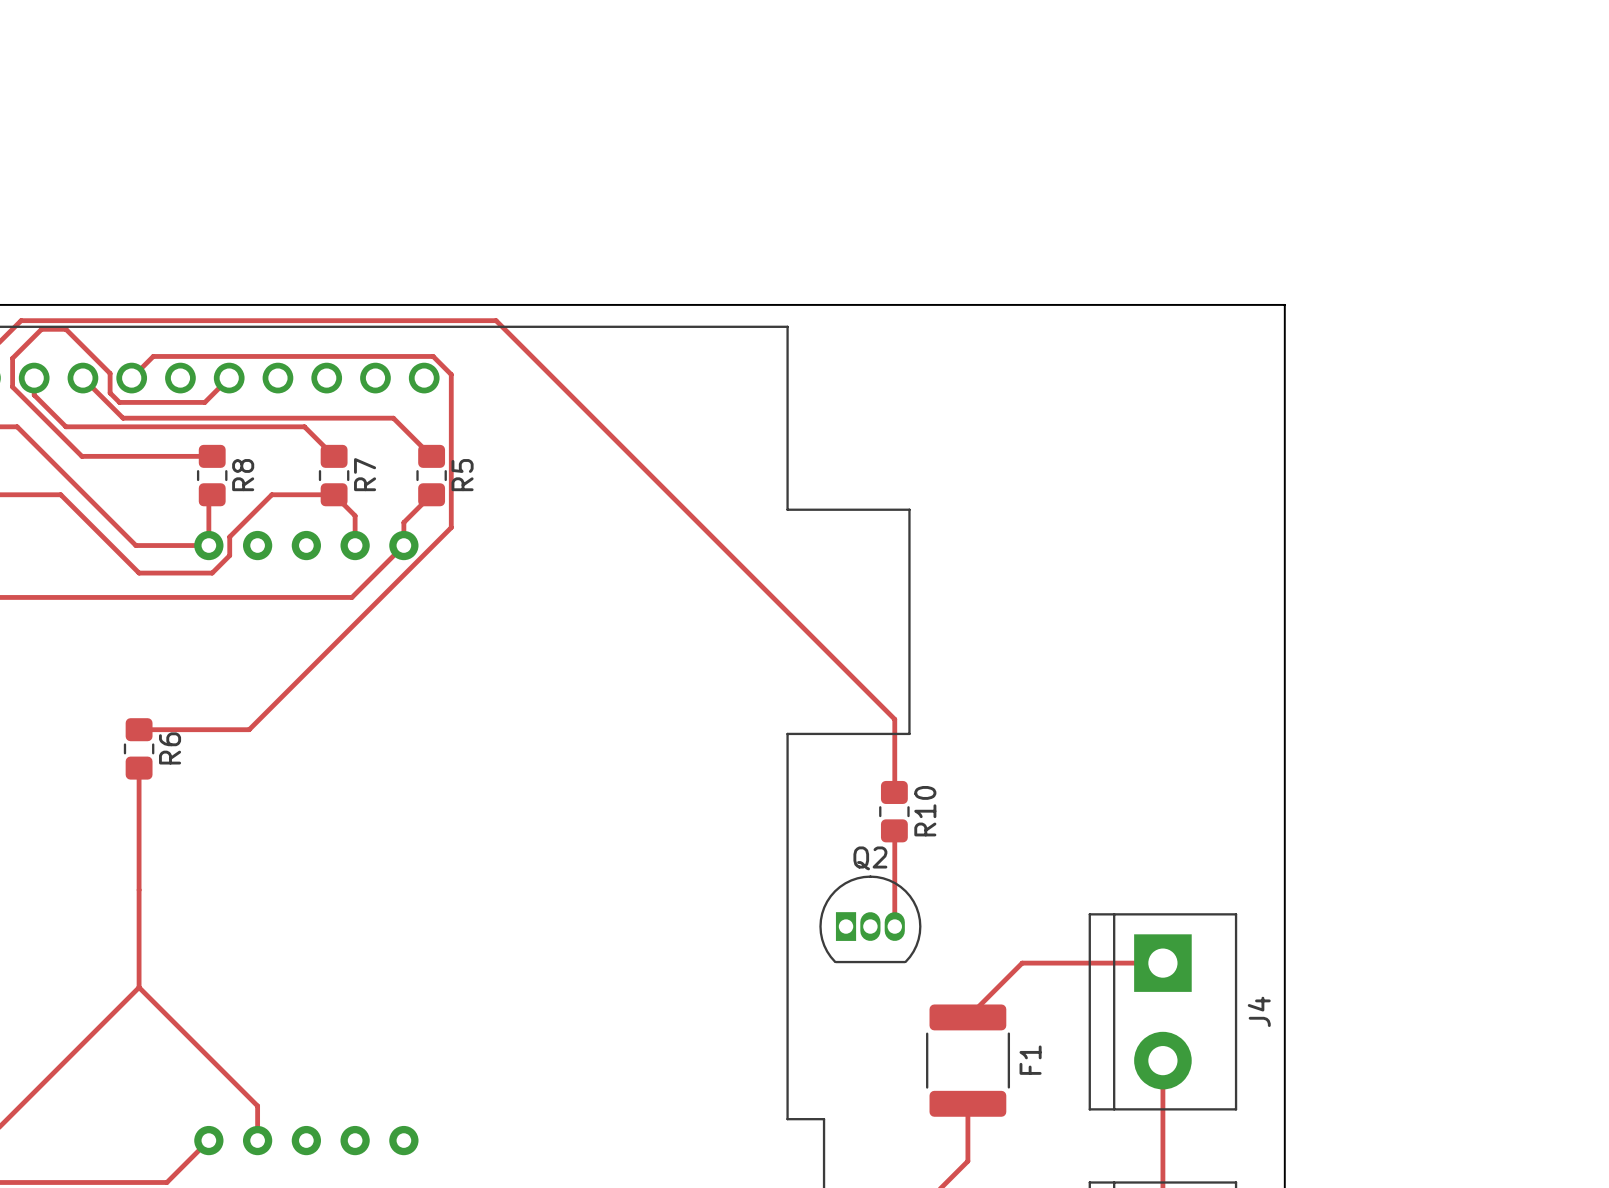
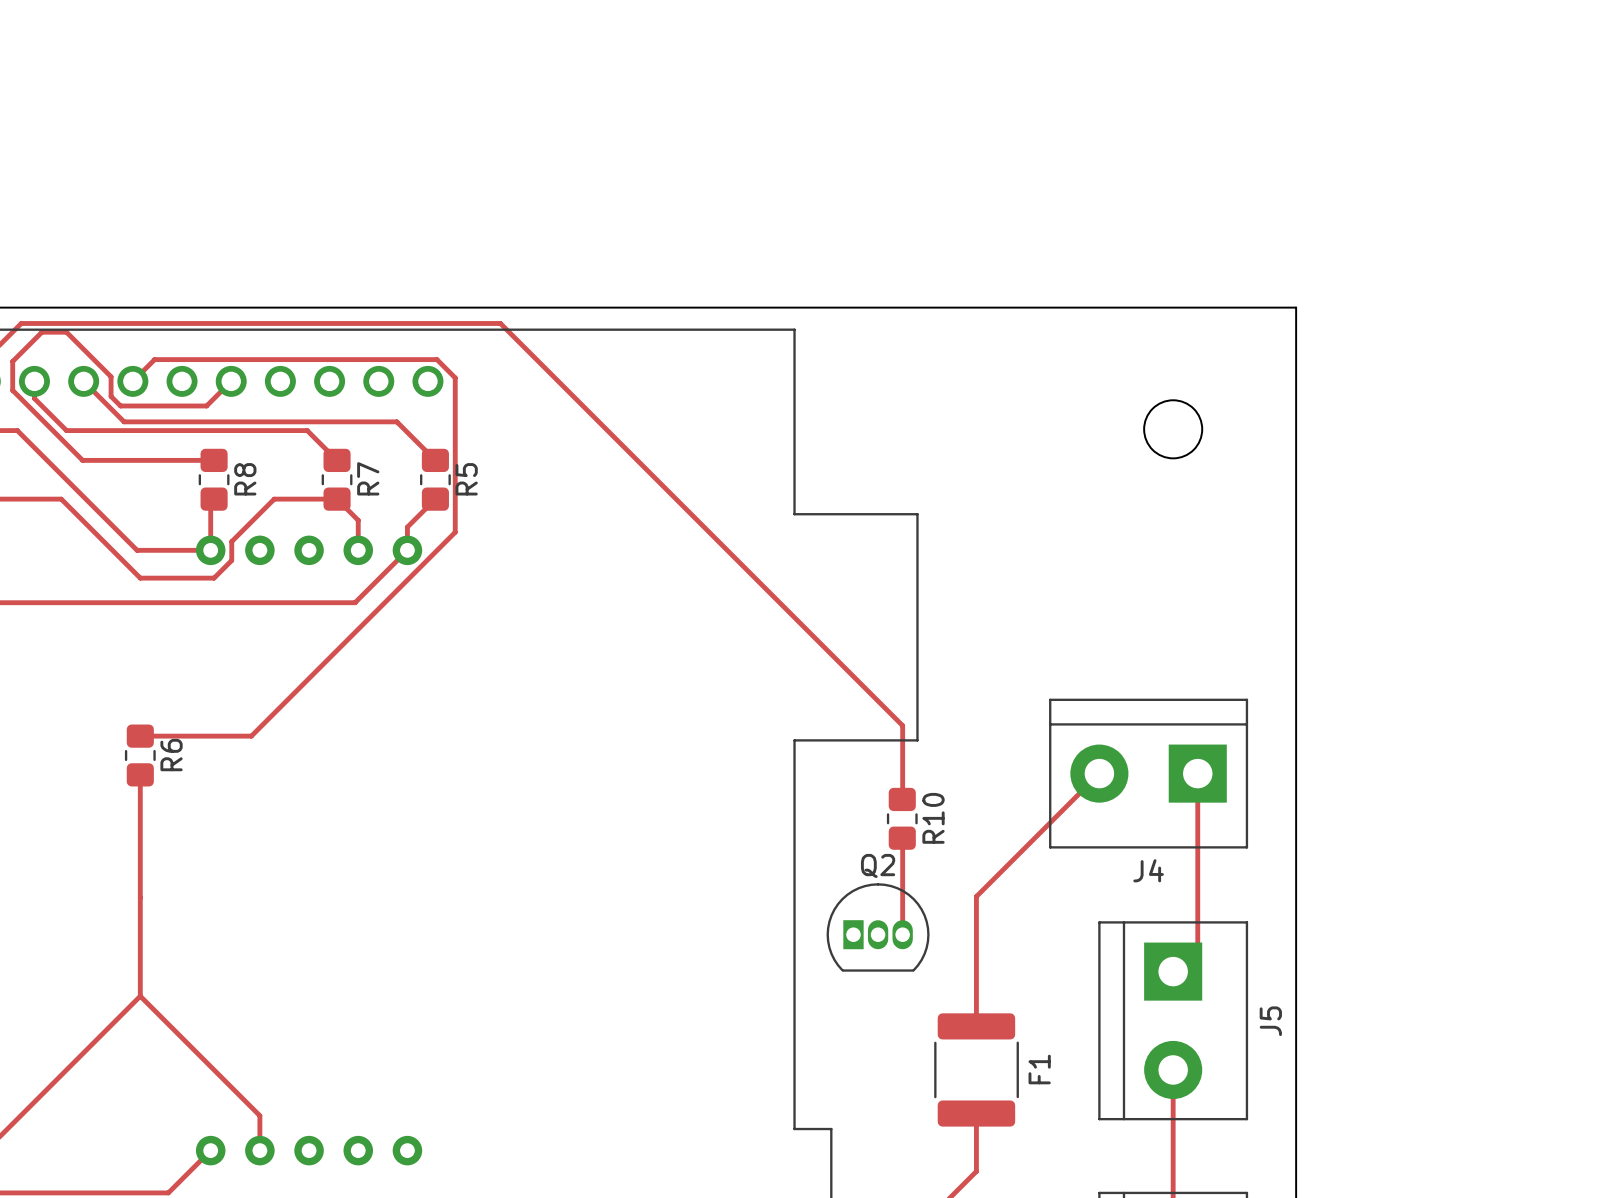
round board edge: none -> [1143, 399, 1204, 460]
J4: none -> (1148, 773)
track: none -> (1197, 773) (1197, 947) (1173, 971)
track: (1162, 963) (1022, 963) (967, 1017) -> (1099, 773) (976, 896) (976, 1026)
J4 name: J4 (1259, 1011) -> J5 (1270, 1021)

